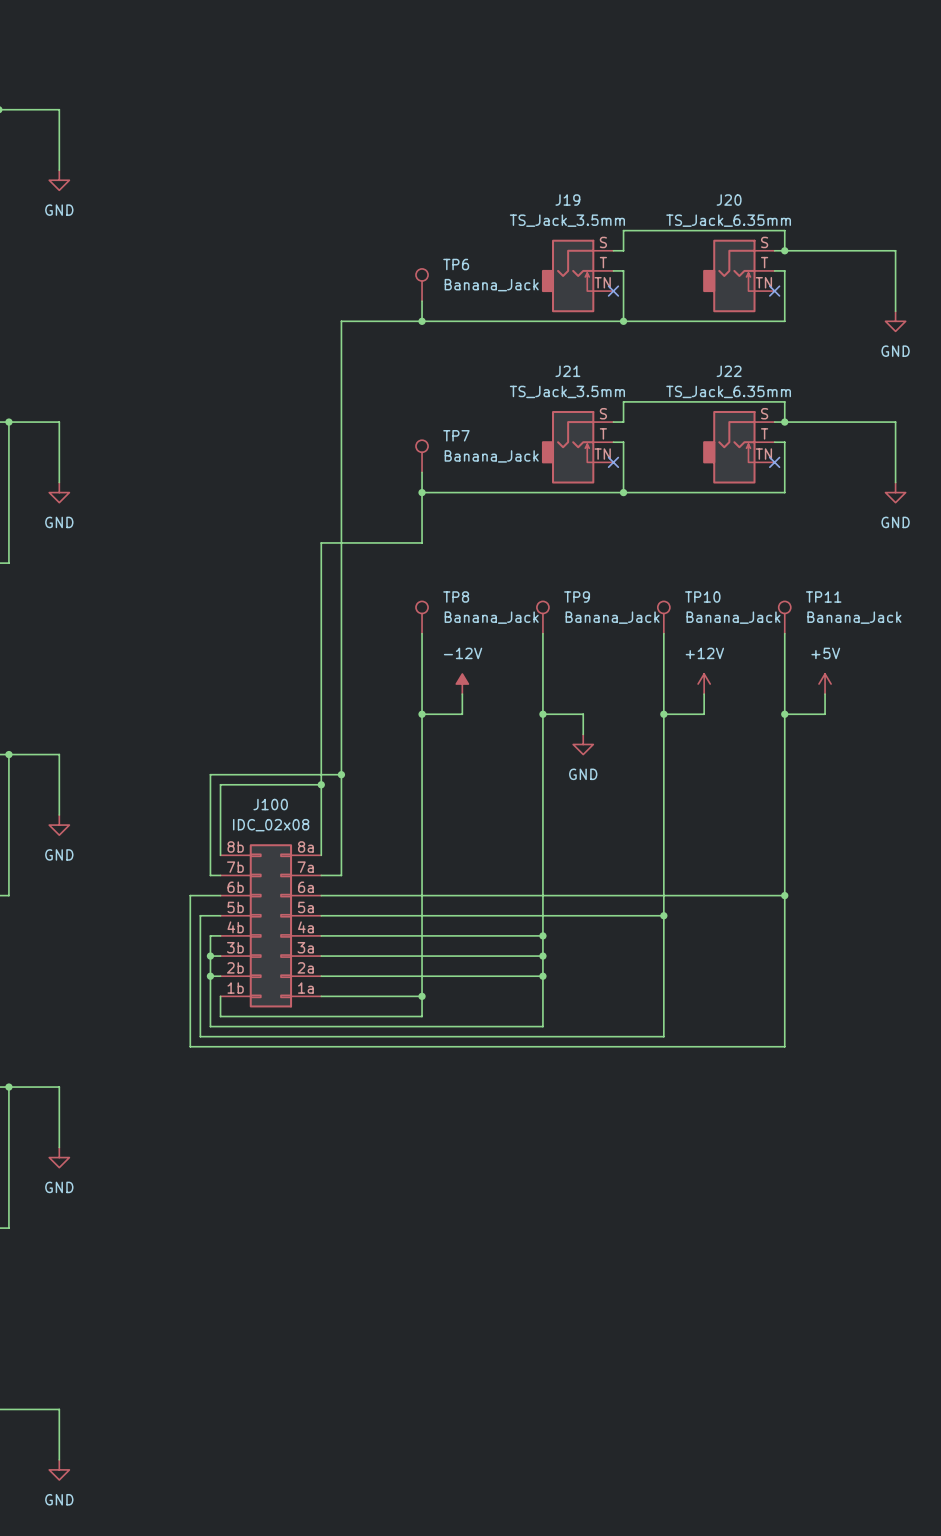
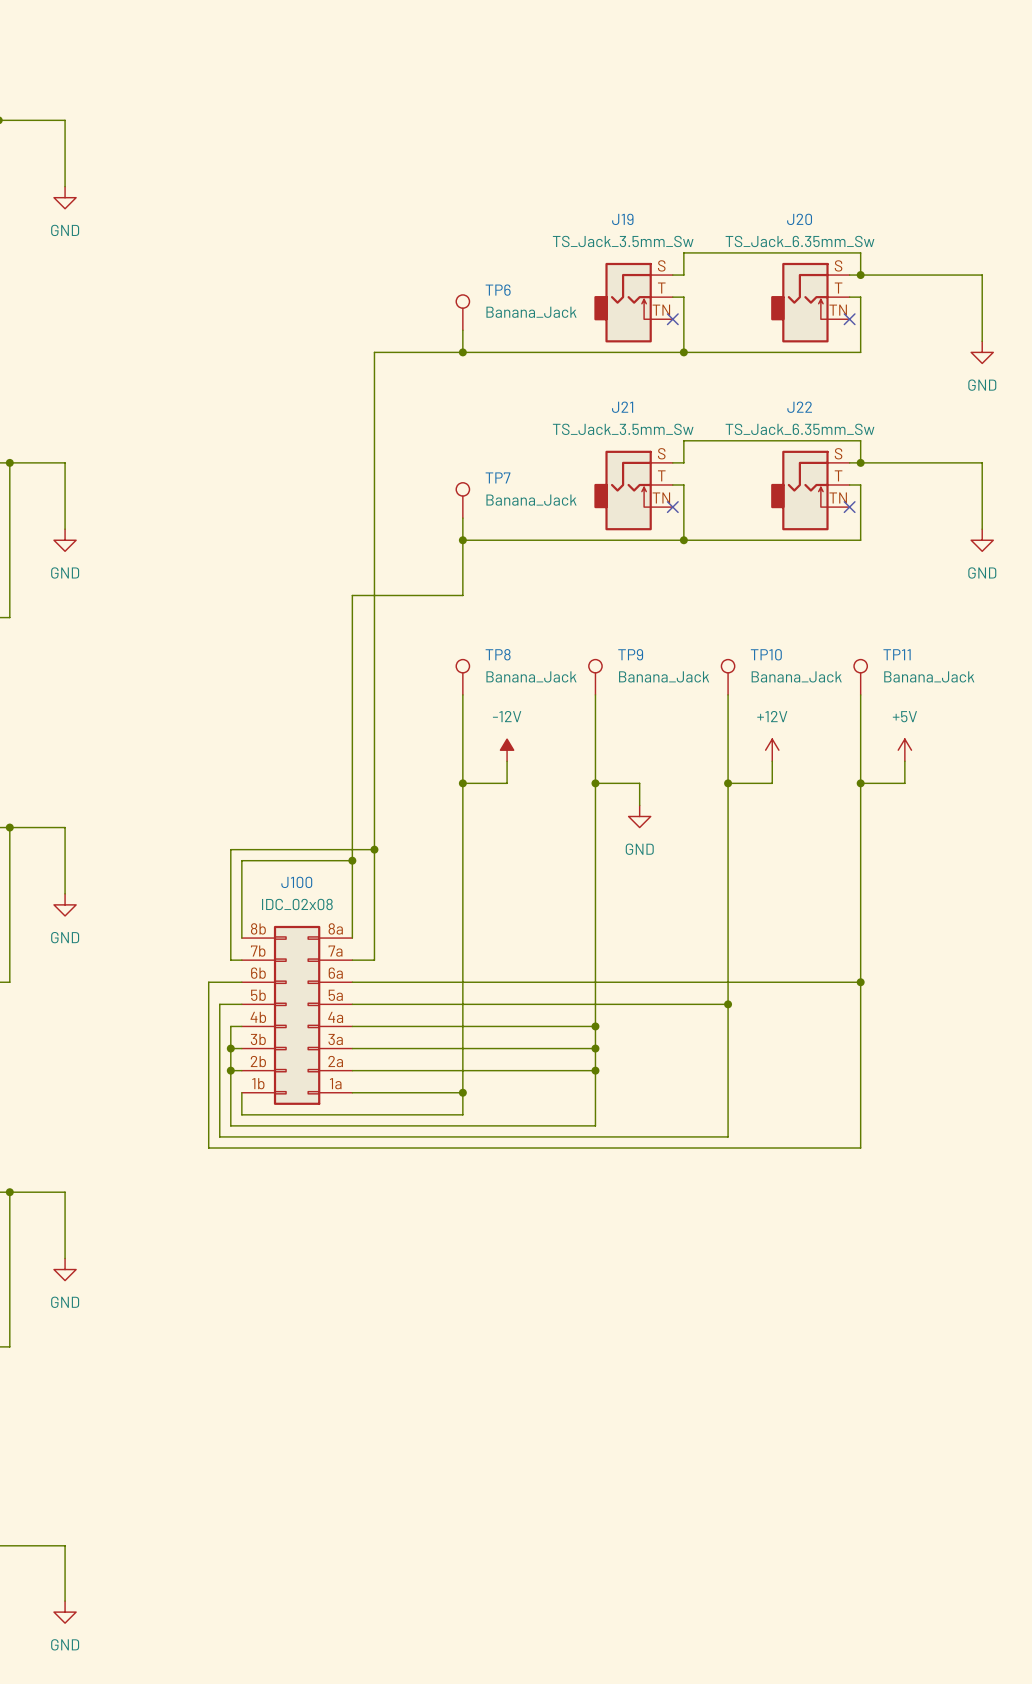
J19 value: TS_Jack_3.5mm (567, 220) -> TS_Jack_3.5mm_Sw (623, 241)
J20 value: TS_Jack_6.35mm (728, 220) -> TS_Jack_6.35mm_Sw (799, 241)
J21 value: TS_Jack_3.5mm (567, 391) -> TS_Jack_3.5mm_Sw (623, 429)
J22 value: TS_Jack_6.35mm (728, 391) -> TS_Jack_6.35mm_Sw (799, 429)

